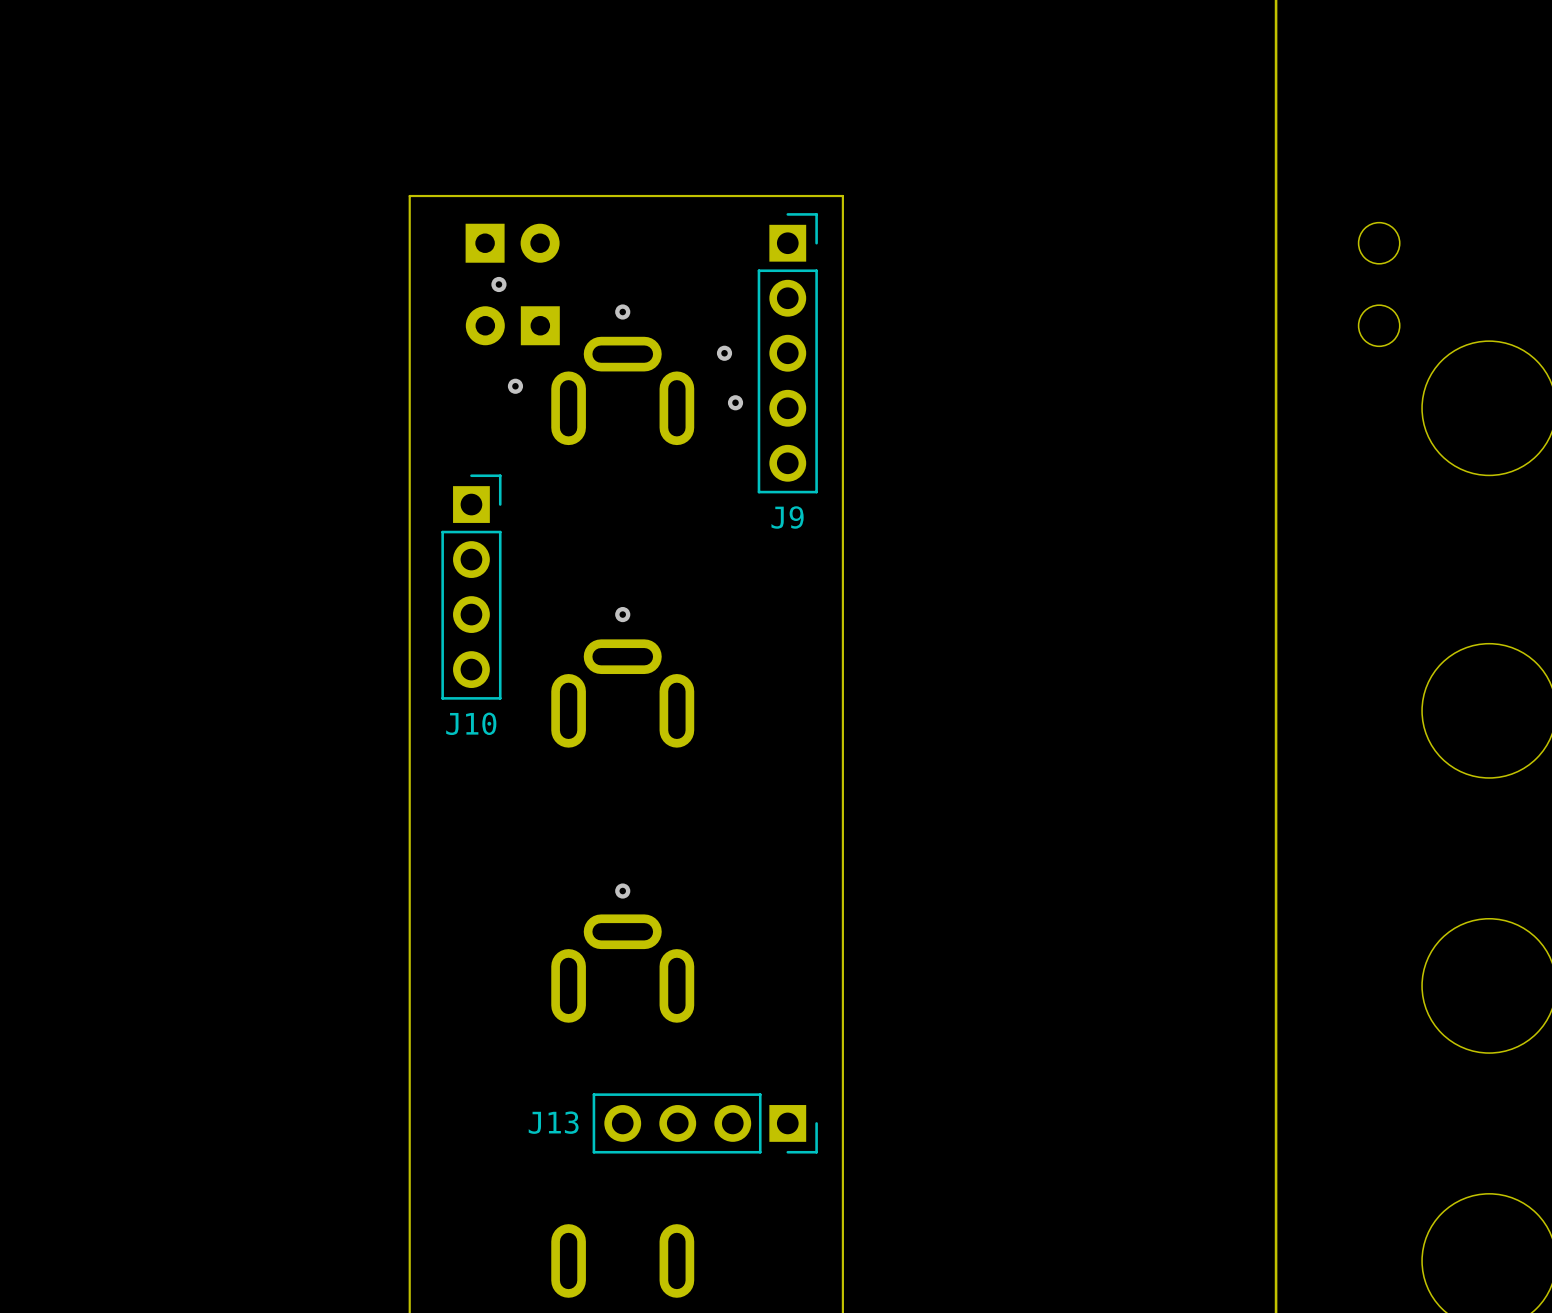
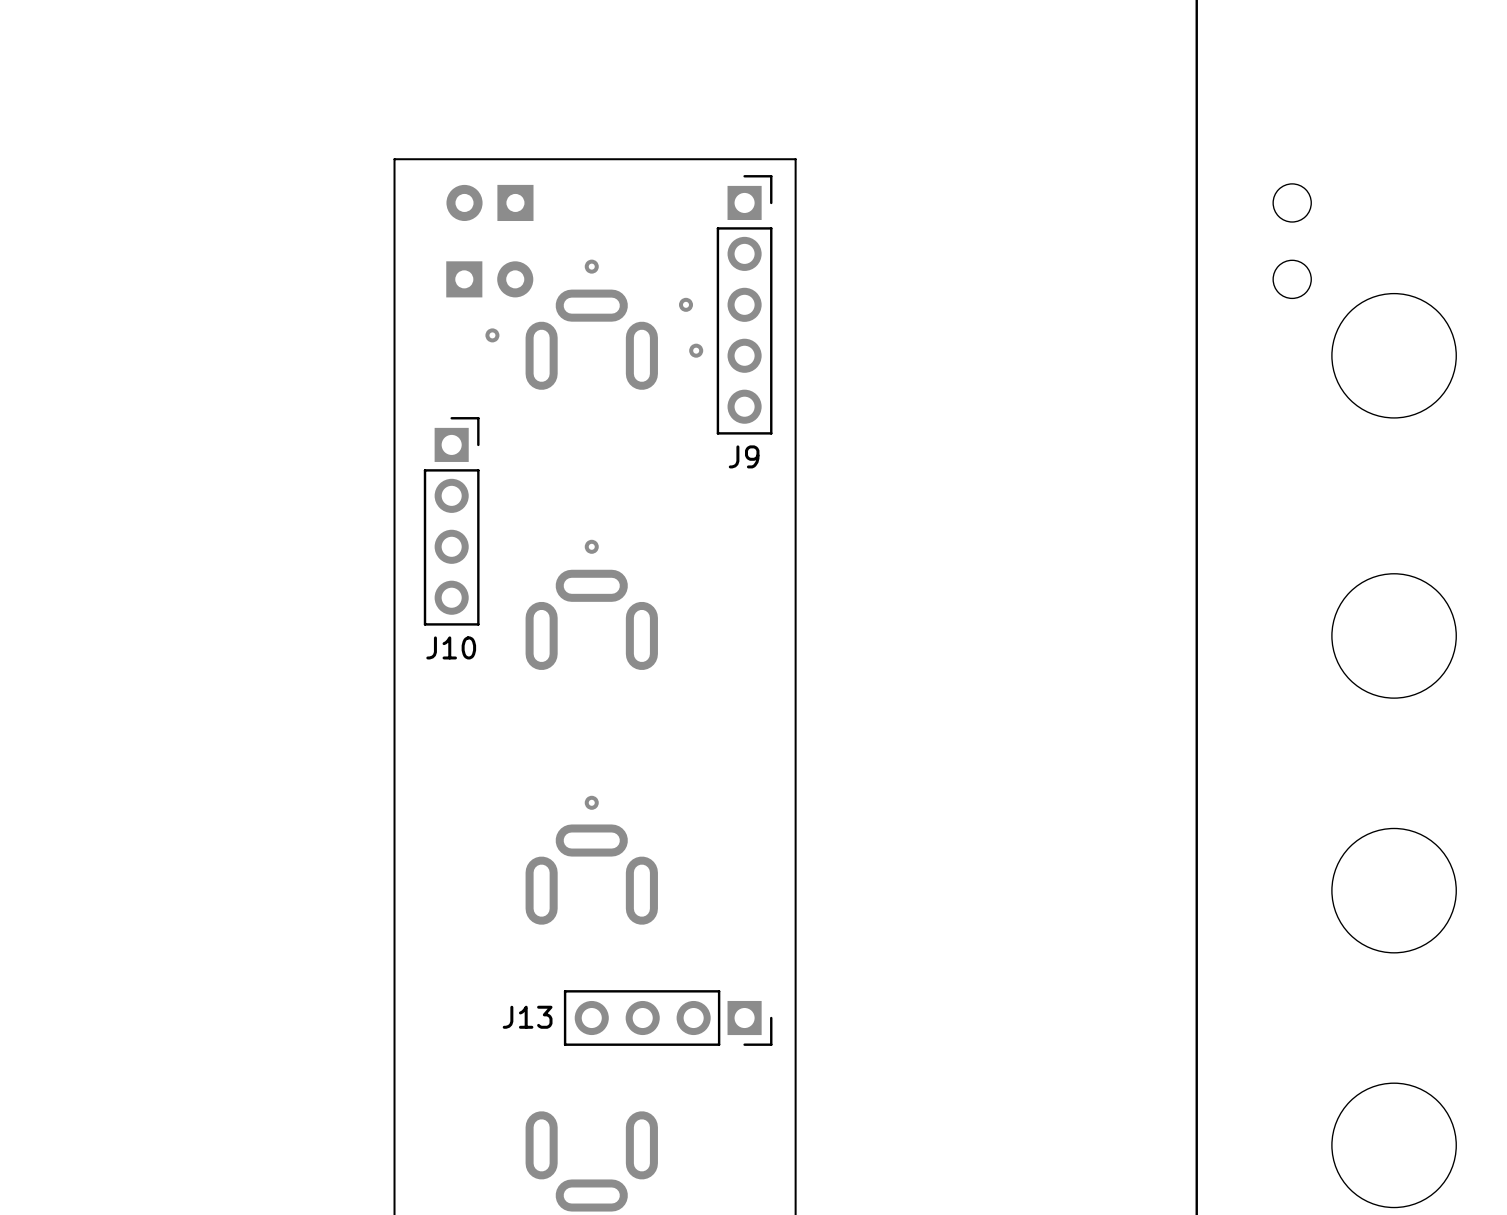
part rotation: 0° (512, 243) -> 180° (489, 202)
via: (498, 284) -> none
part rotation: 0° (512, 325) -> 180° (489, 279)

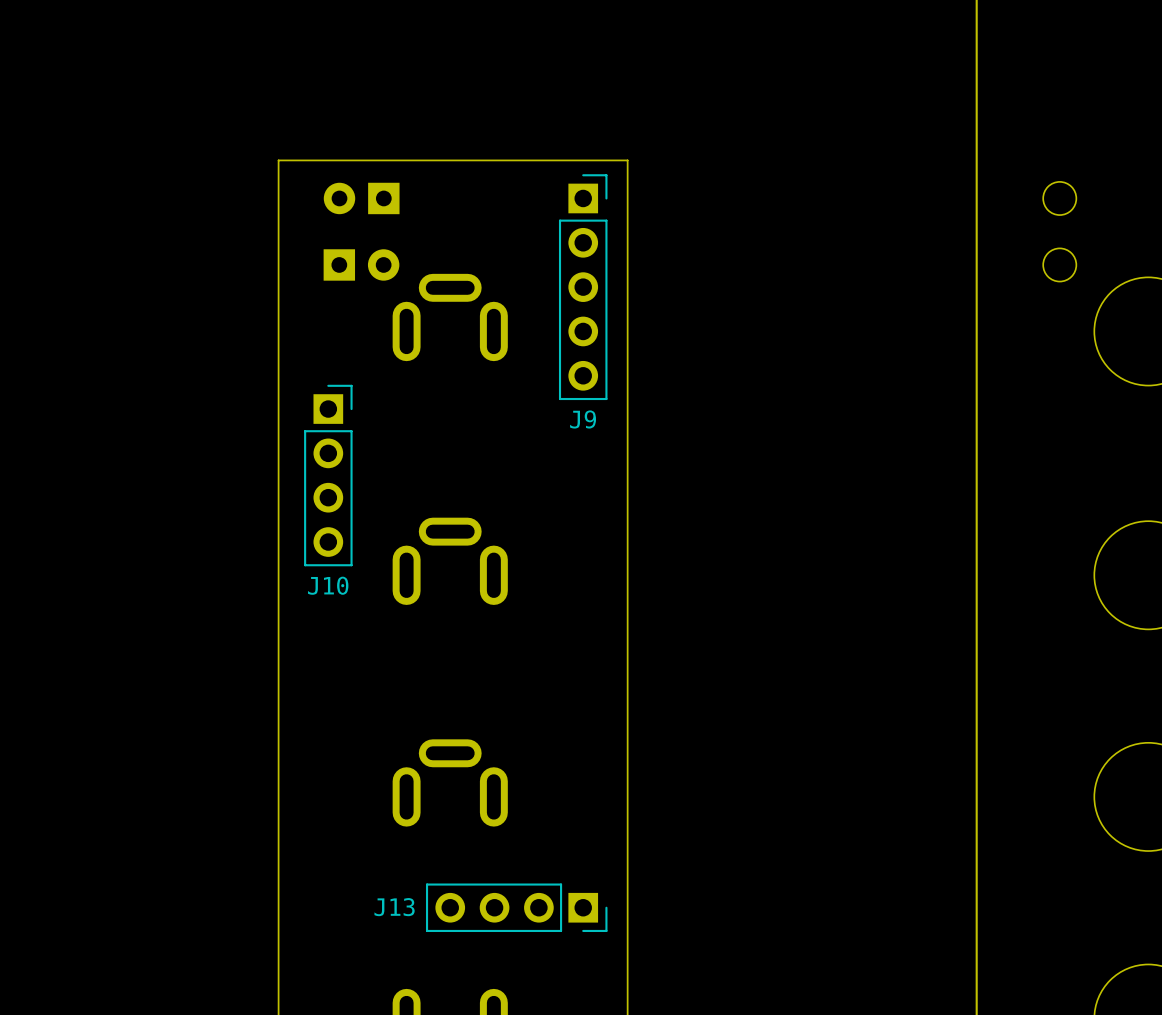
via: (591, 266) -> none
via: (686, 304) -> none
via: (492, 335) -> none
via: (696, 350) -> none
via: (591, 546) -> none
via: (591, 802) -> none

